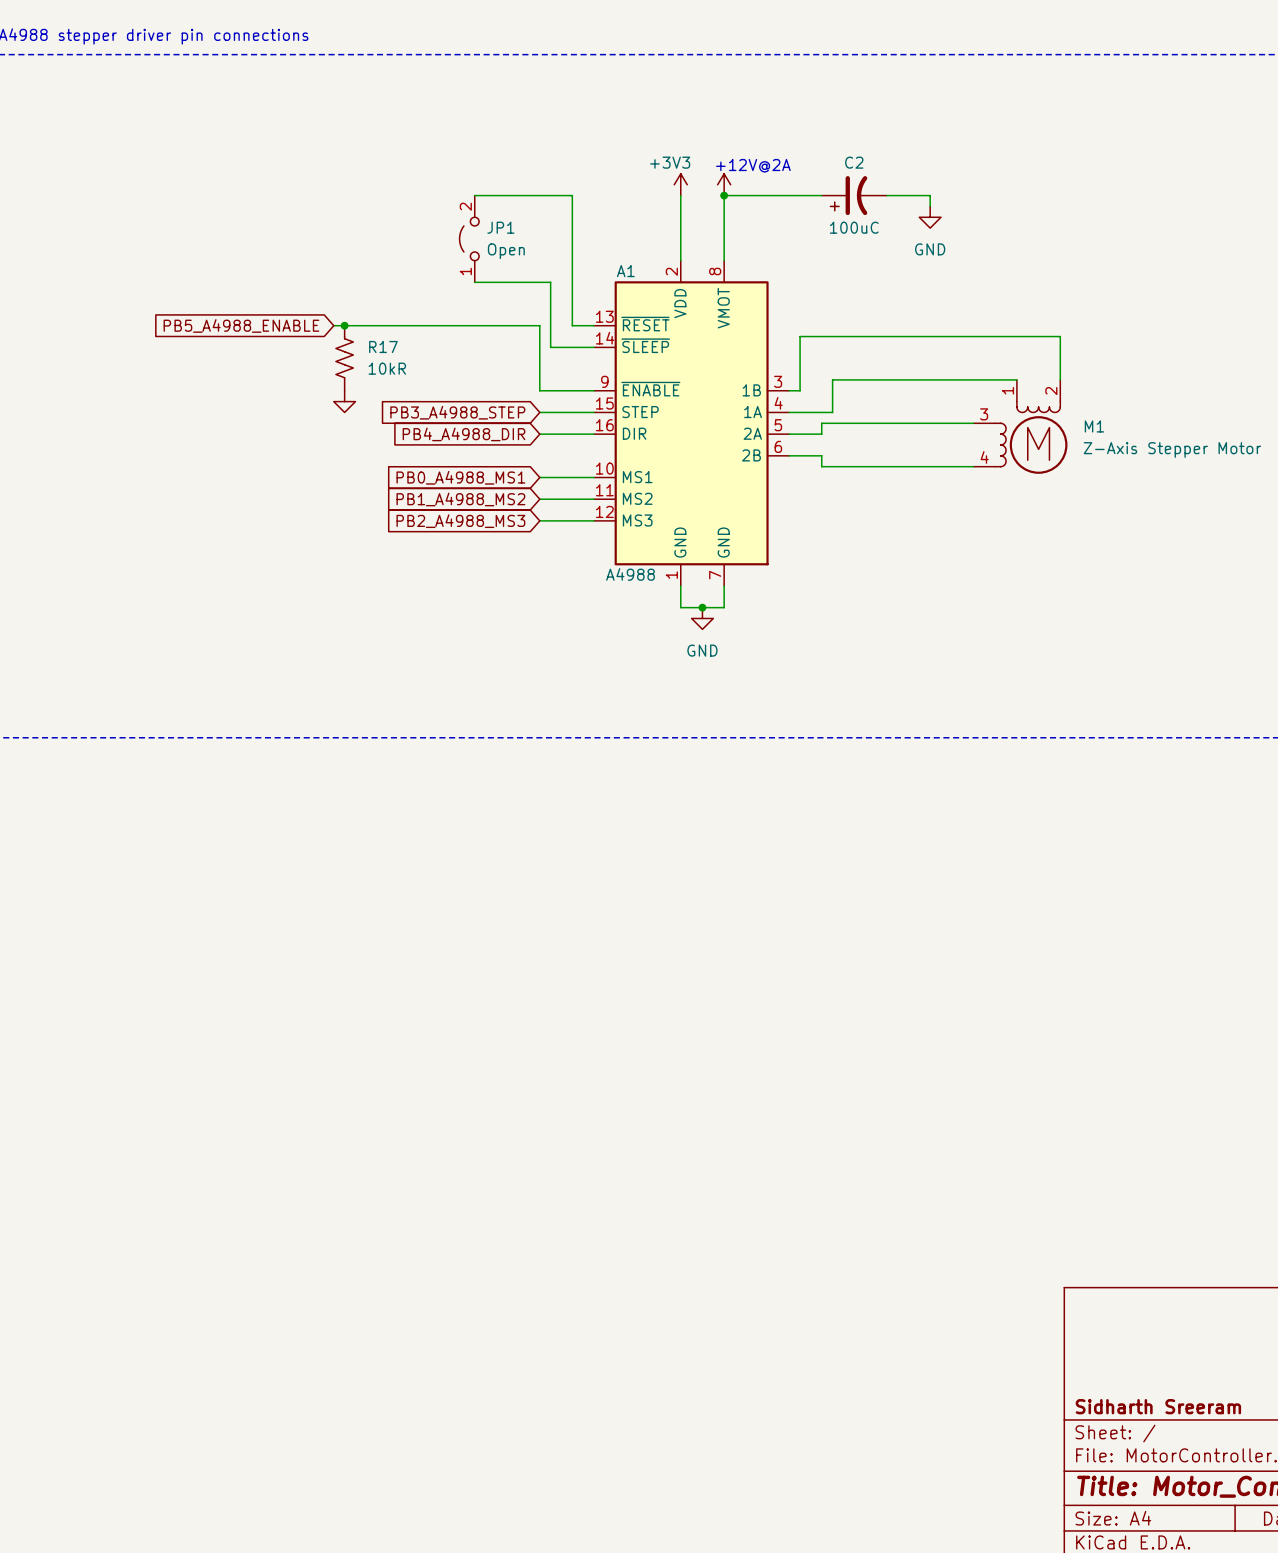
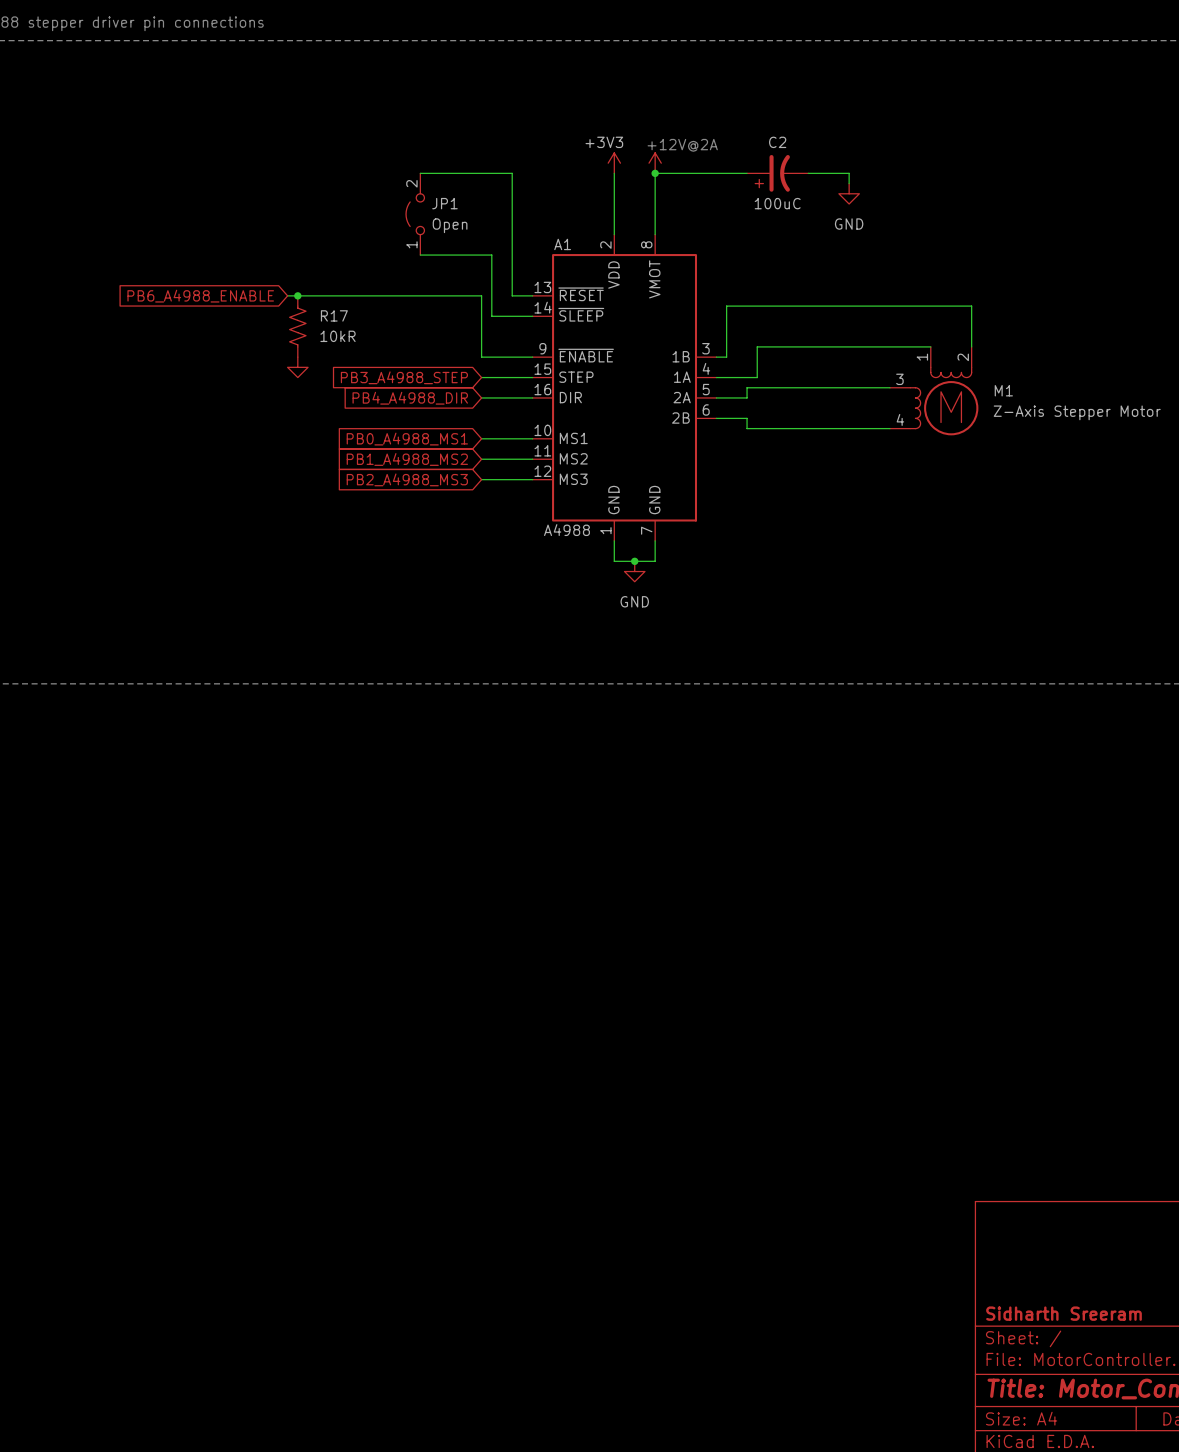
global label: PB5_A4988_ENABLE (241, 325) -> PB6_A4988_ENABLE (200, 296)

